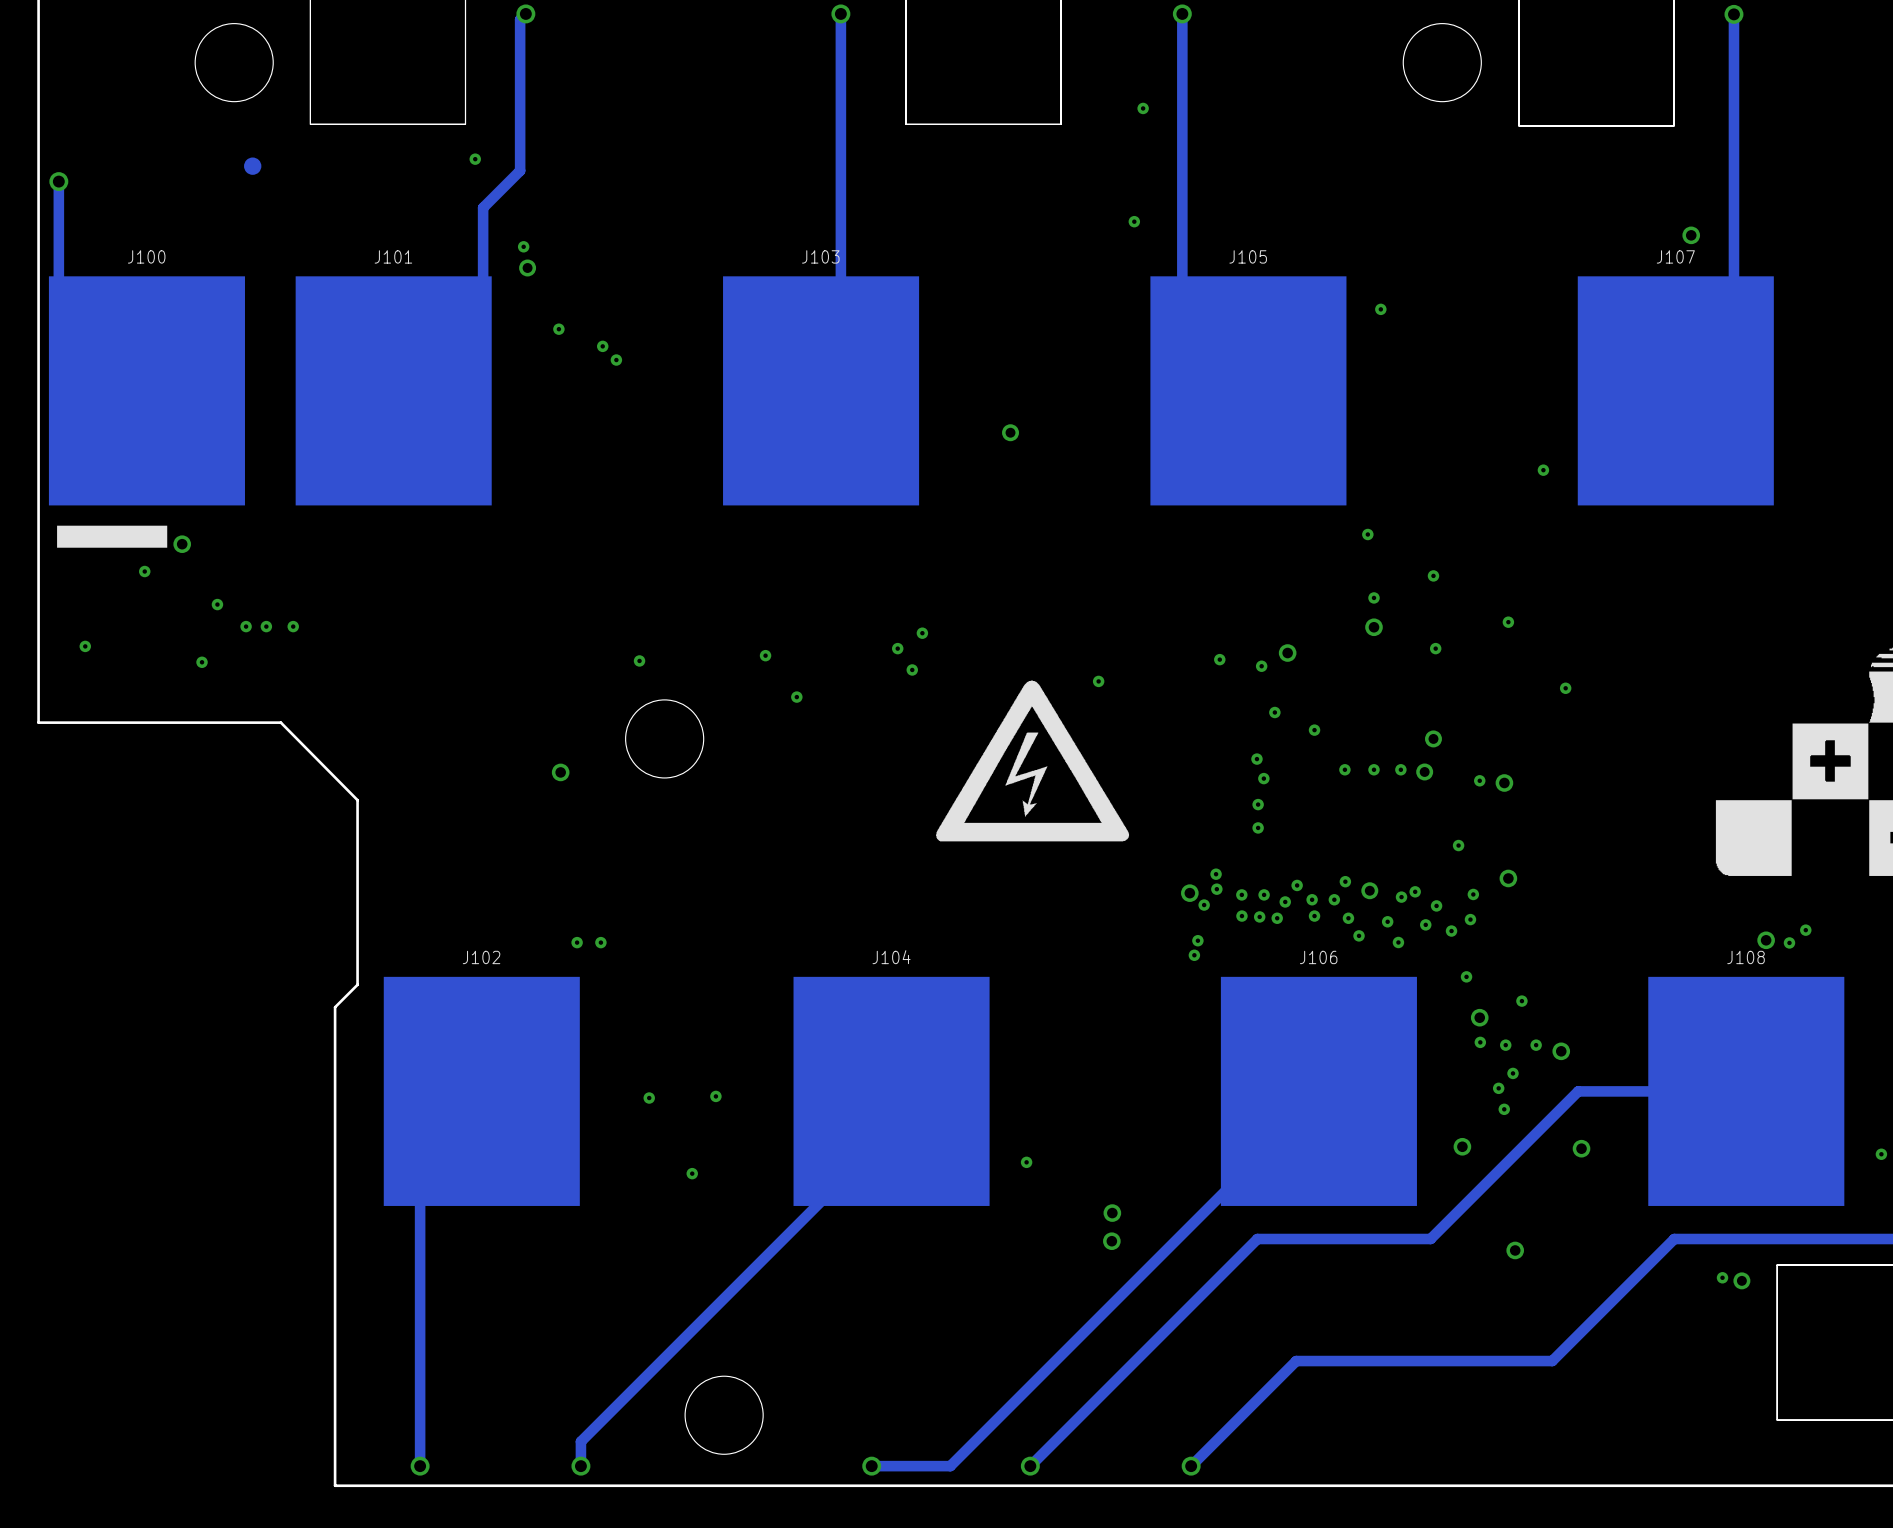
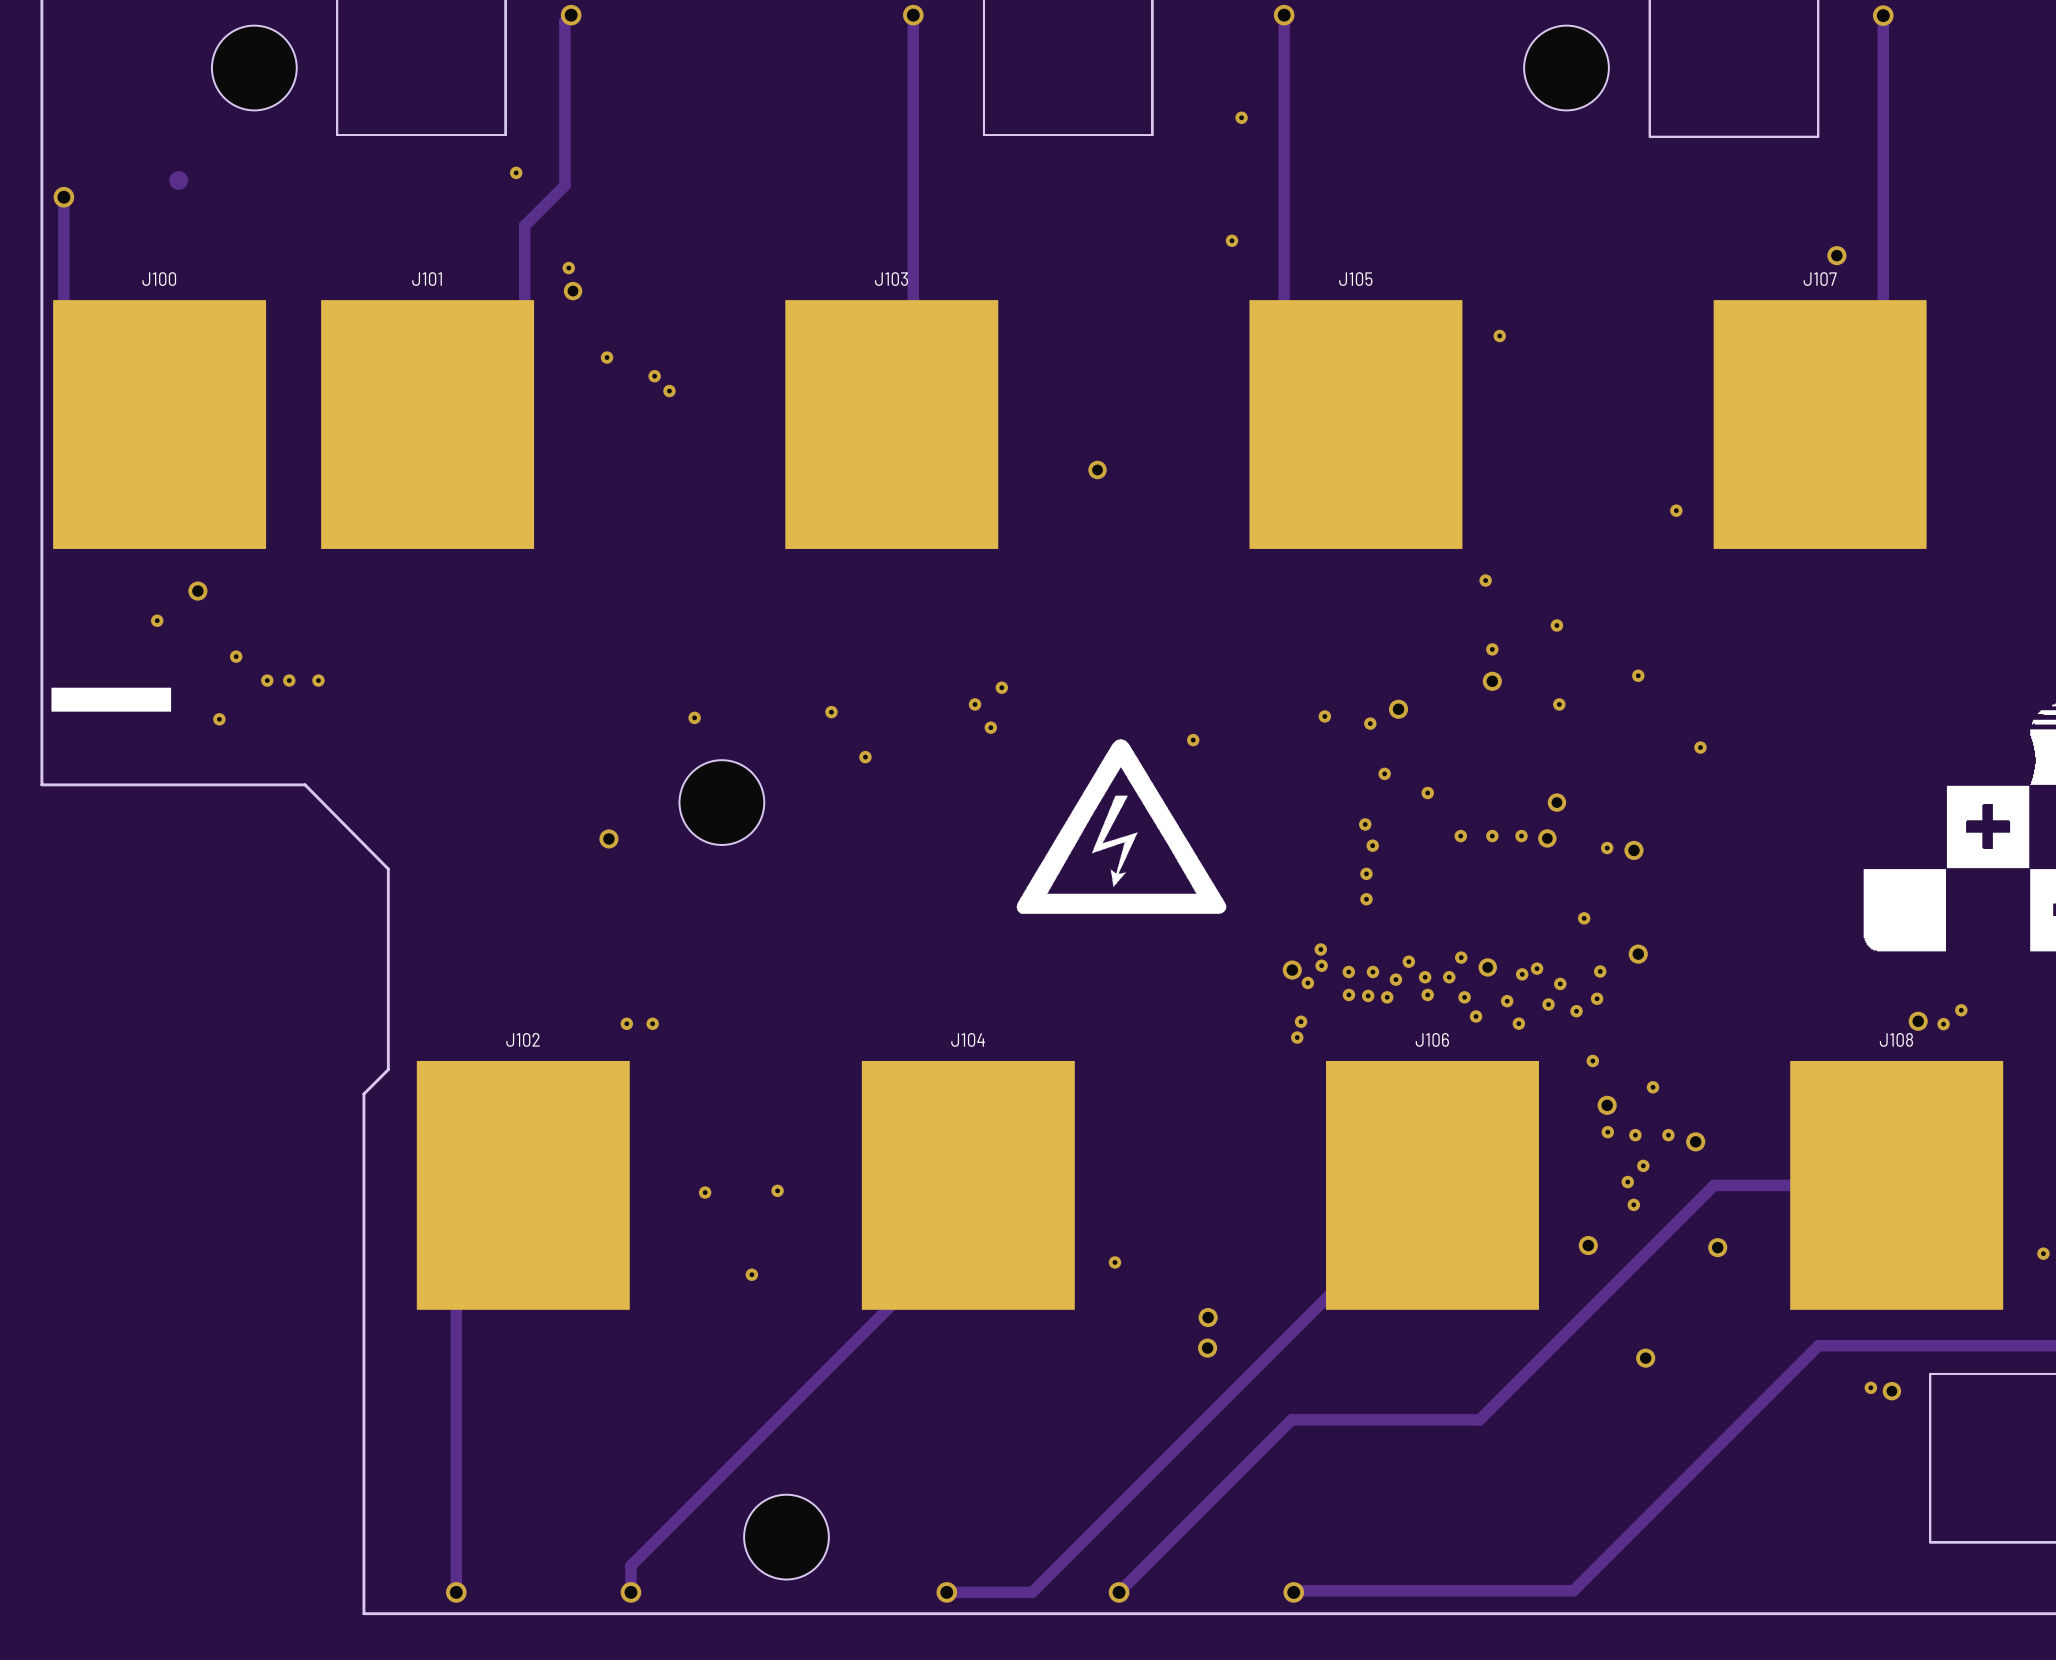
drawing position: (252, 166) -> (178, 180)
drawing position: (112, 536) -> (111, 699)
track: (1430, 1239) (1257, 1239) (1189, 1307) -> (1553, 1345) (1479, 1419) (1291, 1419)
track: (1552, 1361) (1296, 1361) (1192, 1464) -> (1685, 1478) (1573, 1590) (1295, 1590)

